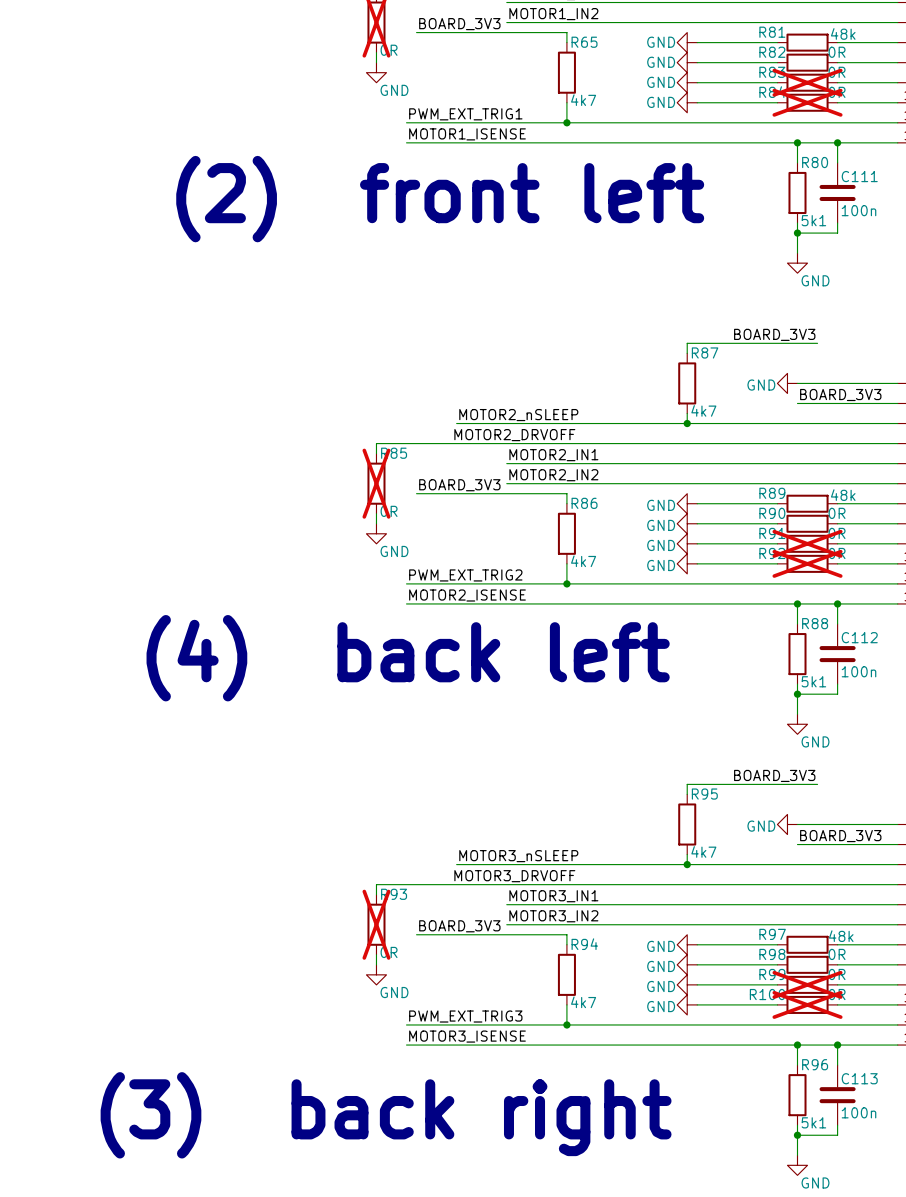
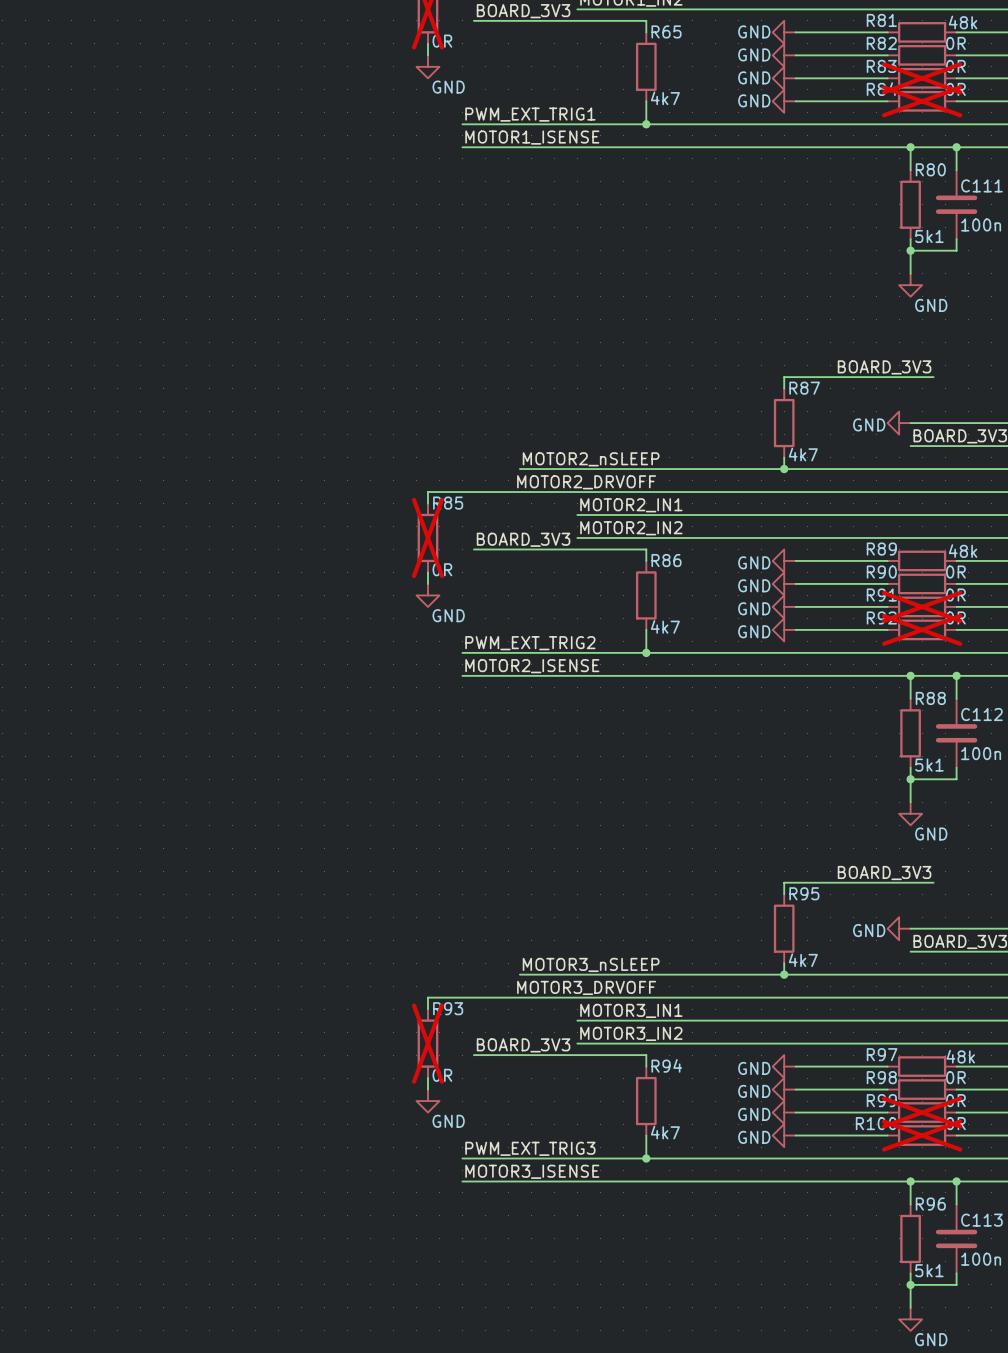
text: (2) front left (440, 199) -> none
text: (4) back left (408, 658) -> none
text: (3) back right (386, 1115) -> none

